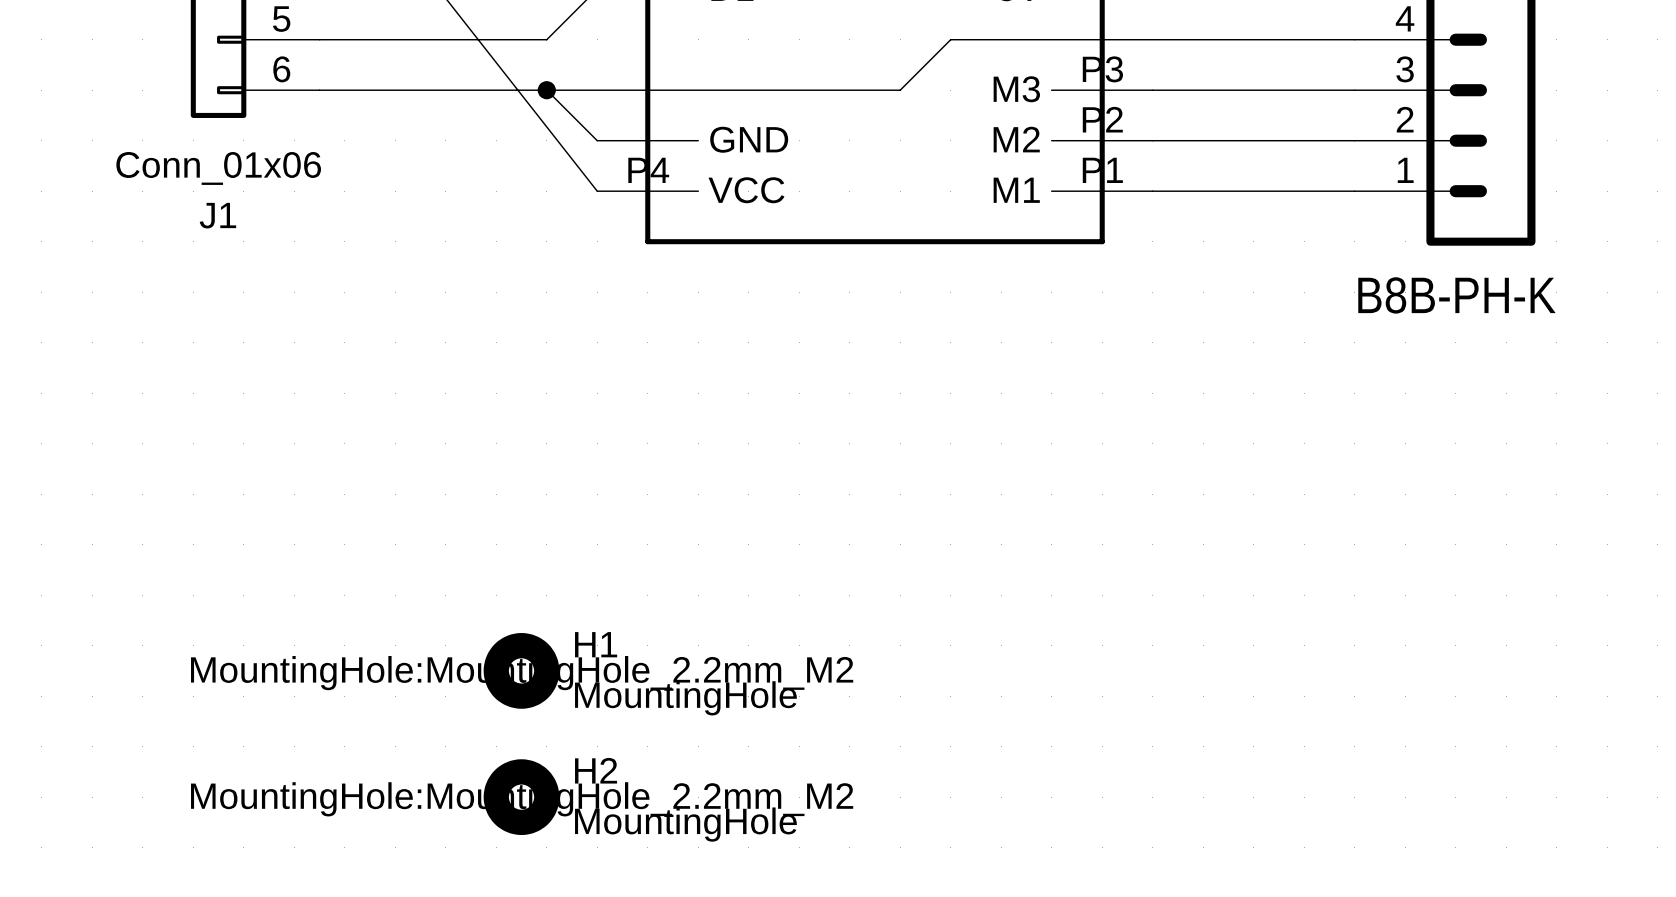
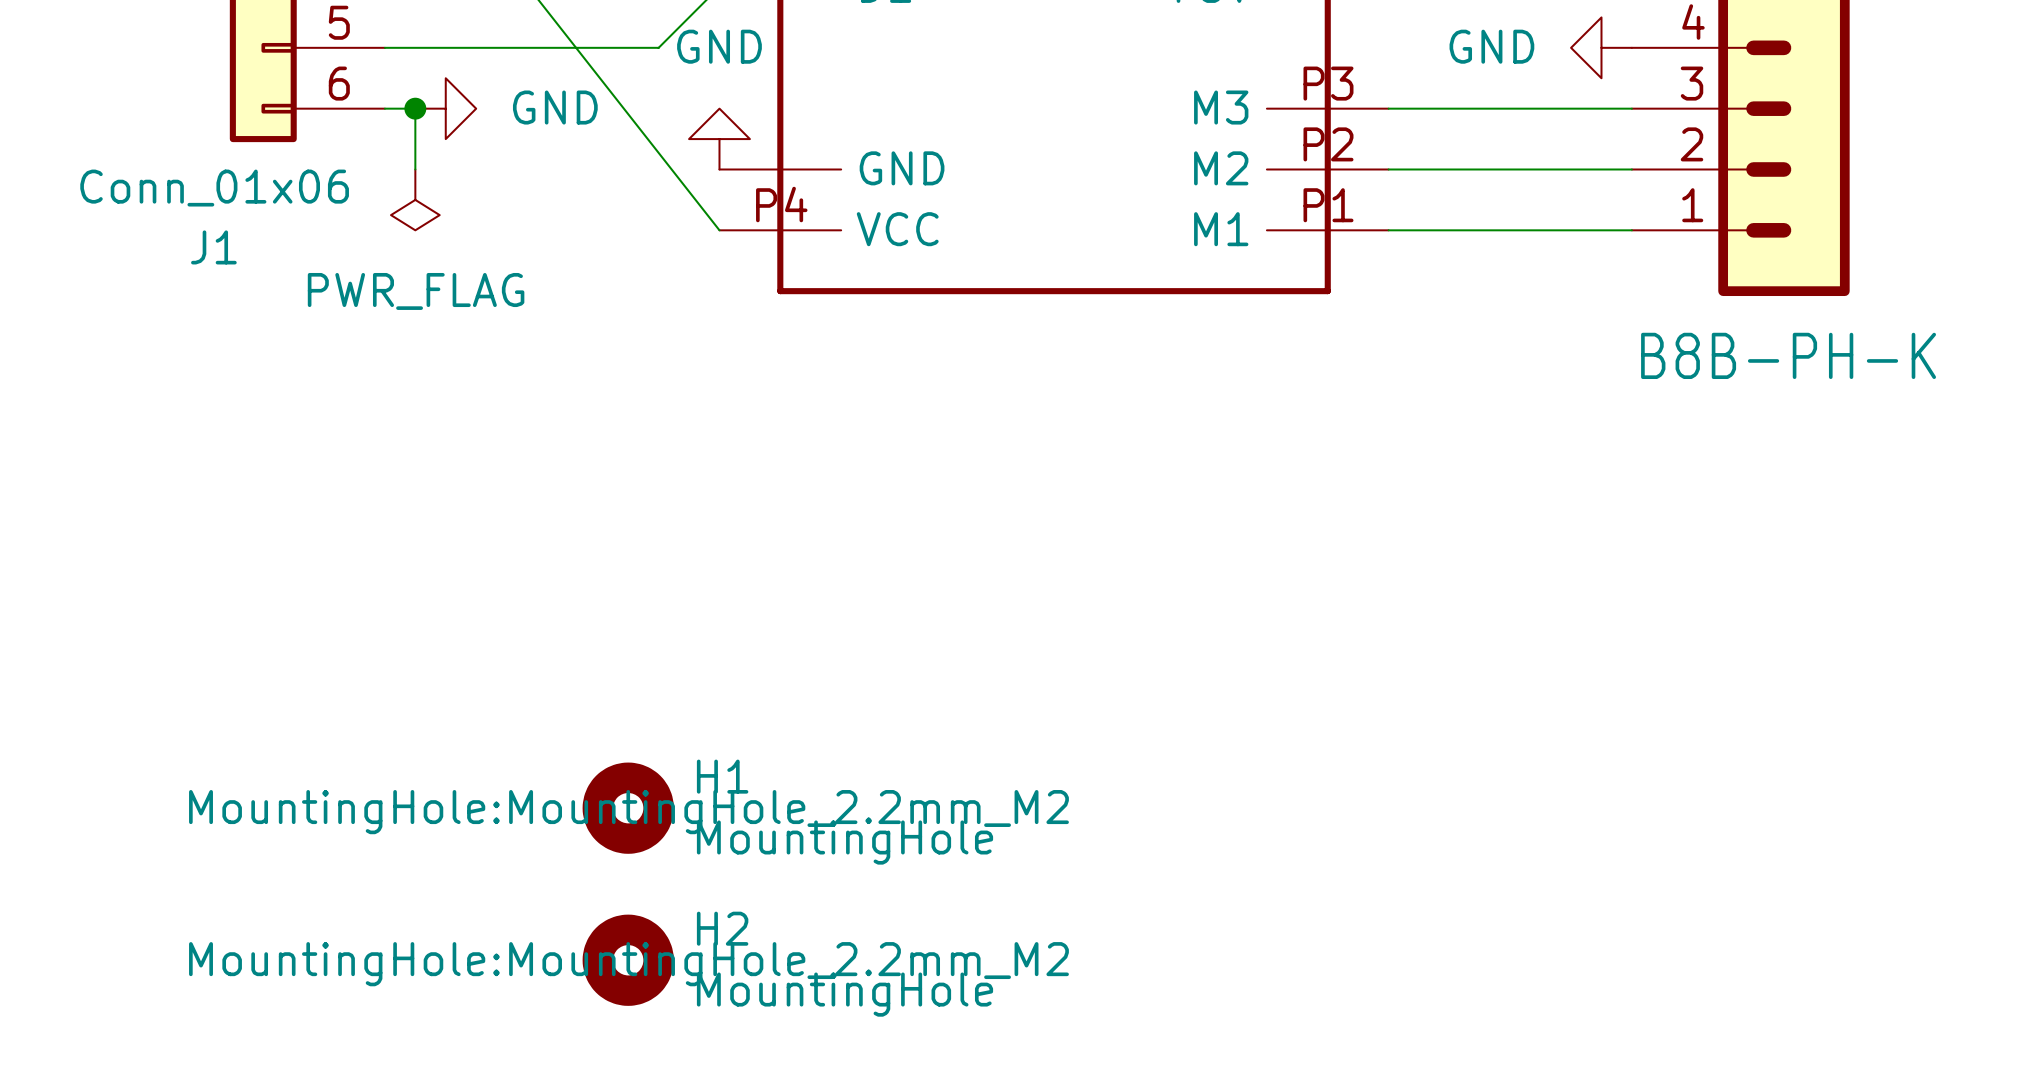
power symbol: none -> GND (1601, 47)
wire: (1354, 39) (950, 39) (900, 90) (344, 90) -> (415, 169) (415, 108)
junction: none -> (415, 108)
power symbol: none -> GND (445, 108)
wire: (546, 90) (597, 140) -> none
junction: (546, 90) -> none
power symbol: none -> GND (719, 139)
power symbol: none -> PWR_FLAG (415, 199)
J1 value position: Conn_01x06 (218, 168) -> Conn_01x06 (214, 188)
J1 name position: J1 (217, 215) -> J1 (213, 247)

